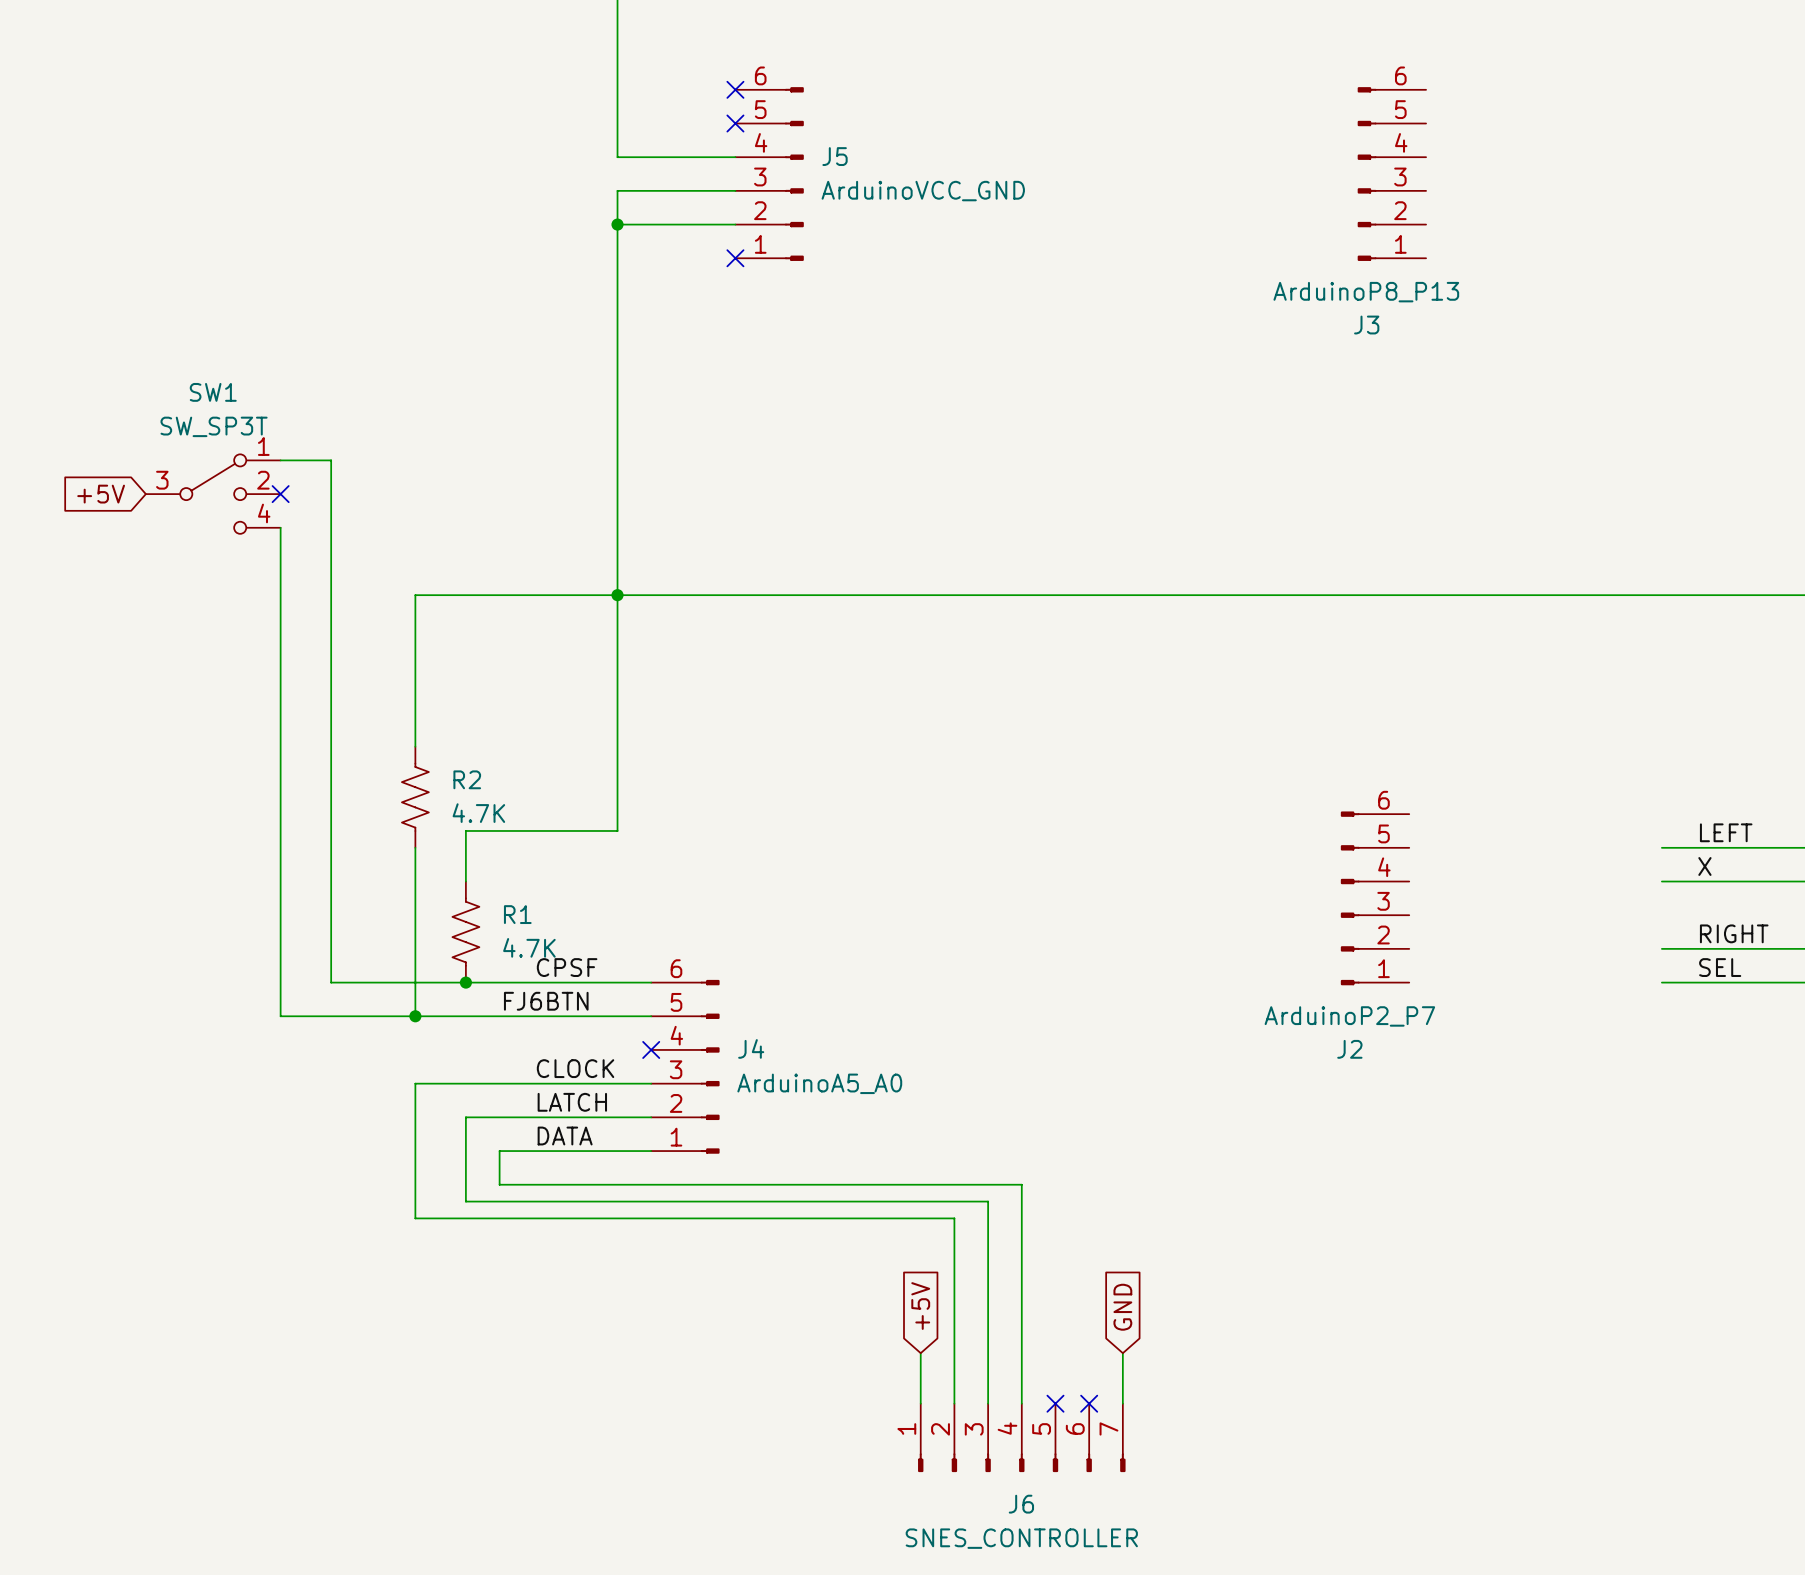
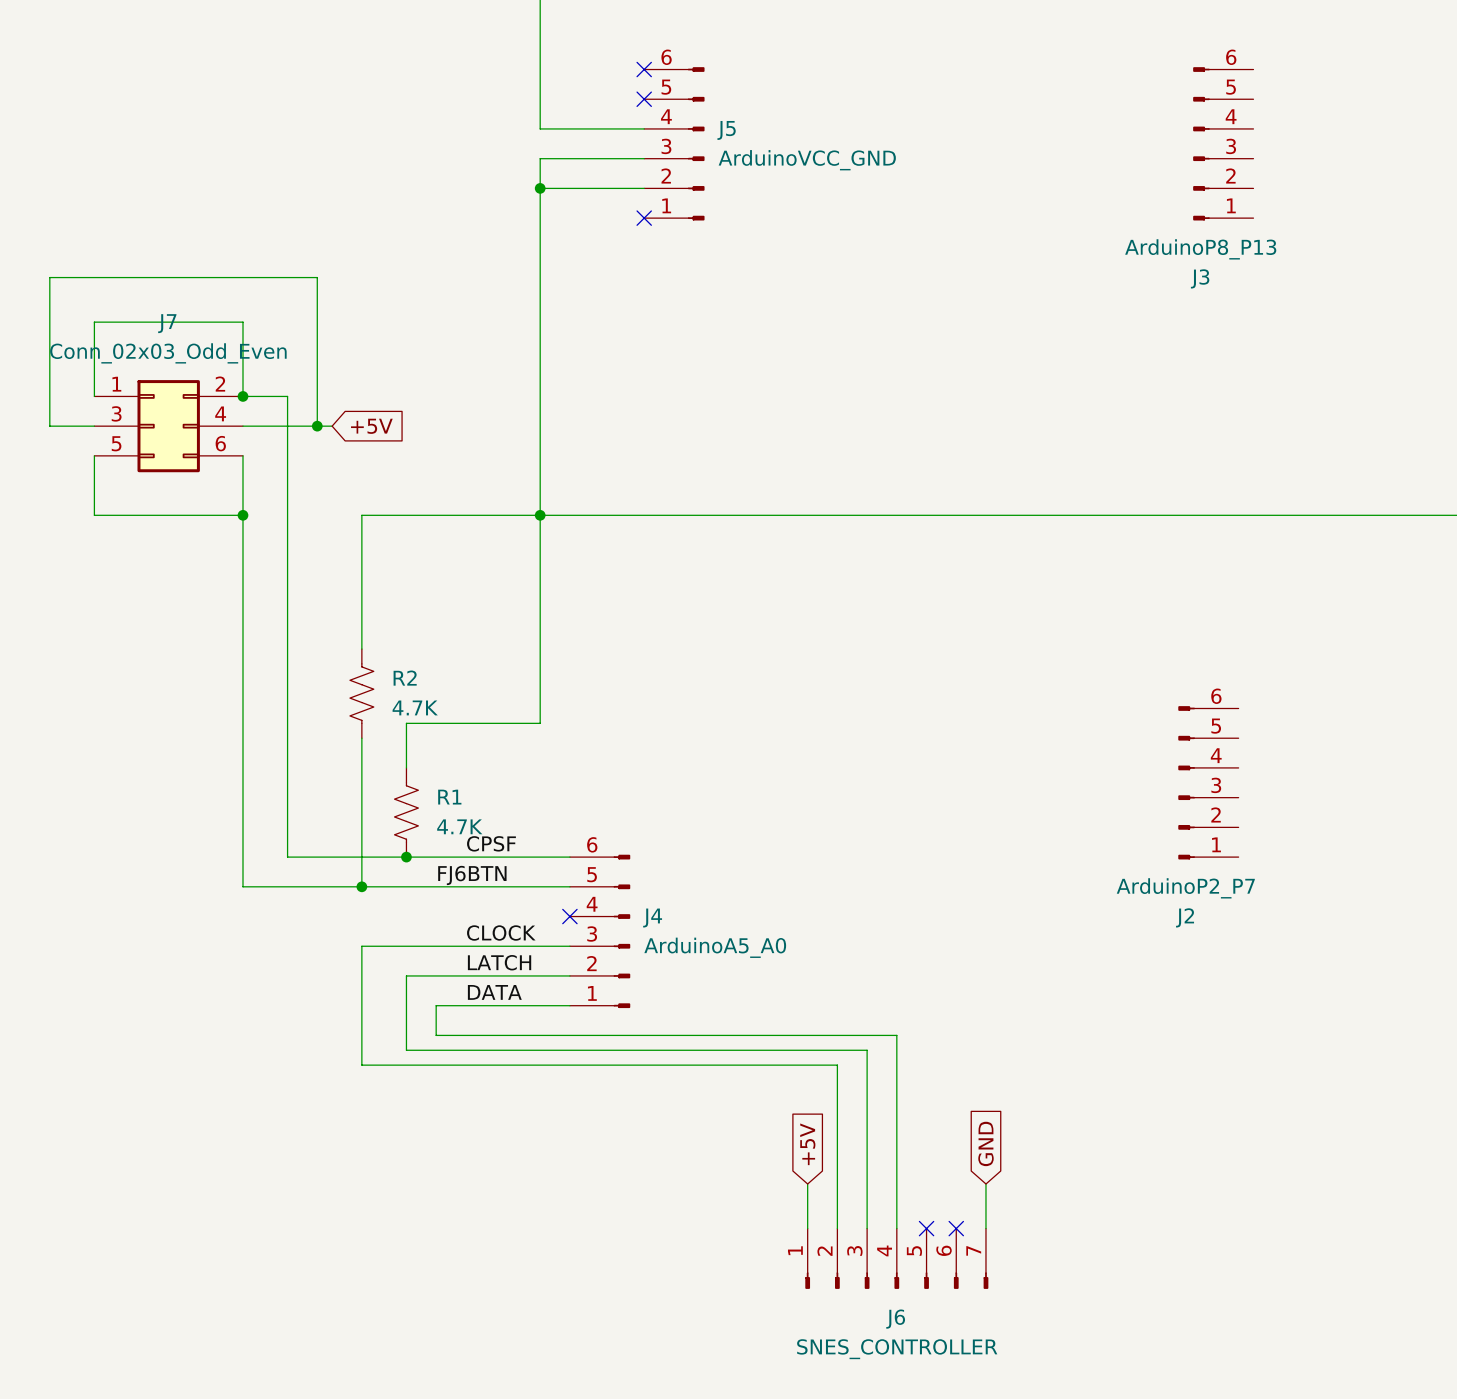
wire: none -> (94, 396) (94, 322) (242, 322) (242, 396)
junction: none -> (242, 396)
global label rotation: 0° (101, 494) -> 180° (371, 426)
global label position: +5V (101, 494) -> +5V (371, 426)
wire: none -> (94, 426) (49, 426) (49, 277) (317, 277) (317, 426)
J7: none -> Conn_02x03_Odd_Even (168, 426)
SW1: SW_SP3T (213, 494) -> none
wire: none -> (242, 426) (332, 426)
no-connect mark: (280, 494) -> none
junction: none -> (317, 426)
wire: none -> (94, 455) (94, 515) (242, 515)
junction: none -> (242, 515)

